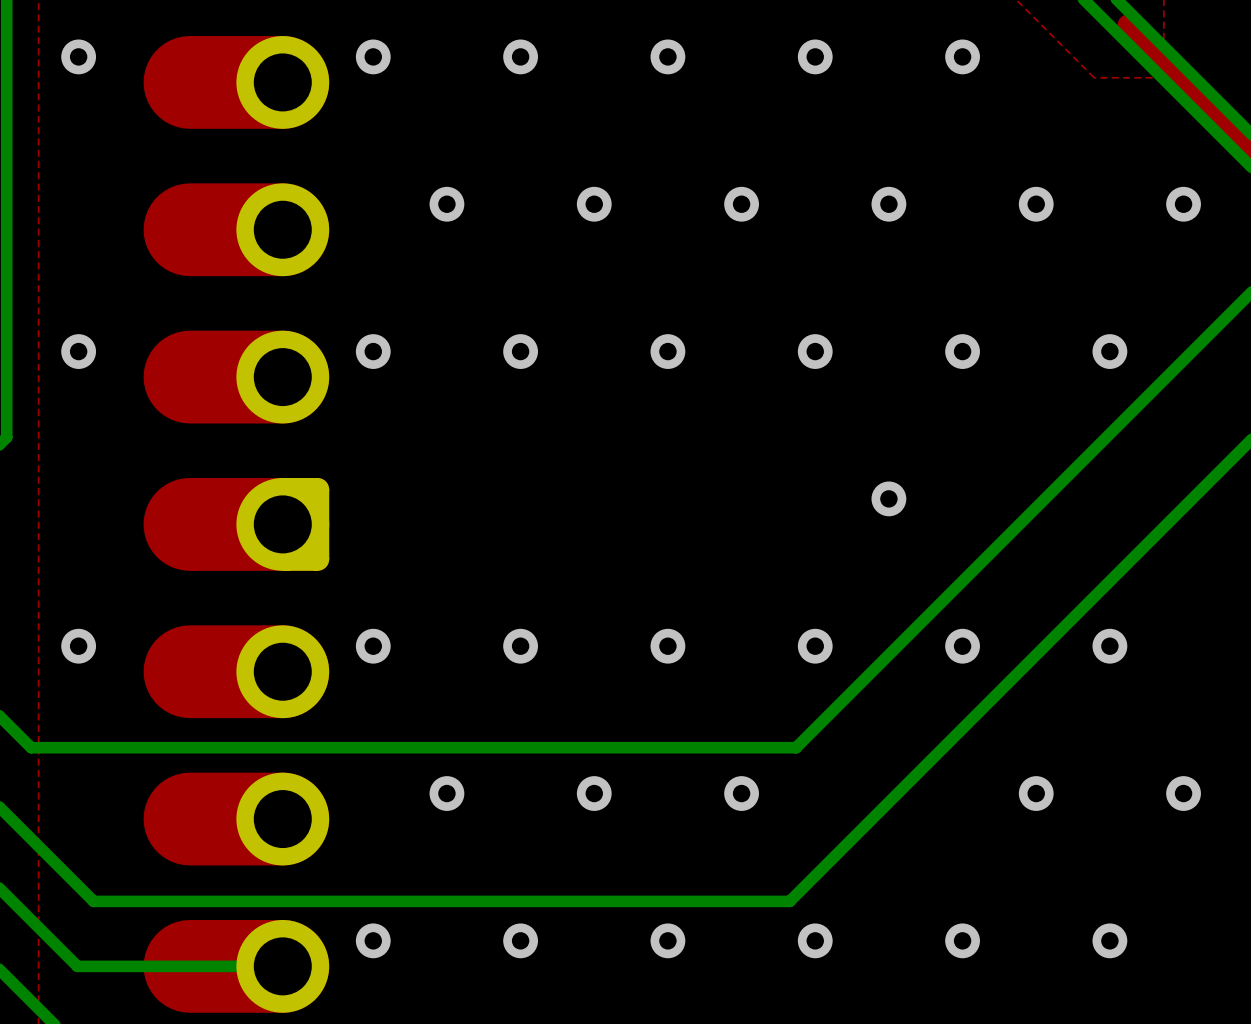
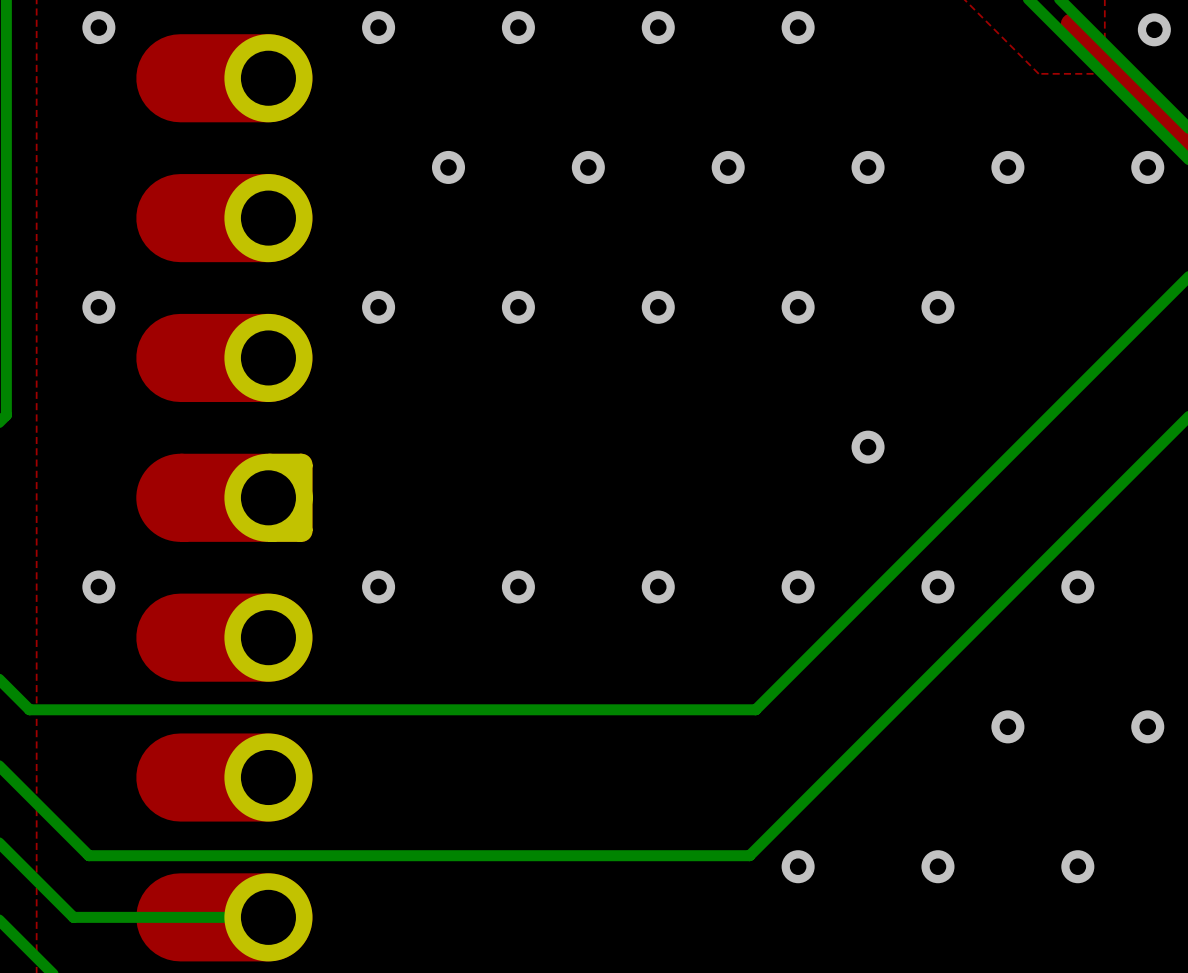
via: none -> (1154, 29)
via position: (78, 56) -> (98, 27)
via position: (373, 56) -> (378, 27)
via position: (520, 56) -> (518, 27)
via position: (667, 56) -> (658, 27)
via position: (815, 56) -> (798, 27)
via: (962, 56) -> none
via position: (446, 204) -> (448, 167)
via position: (594, 204) -> (588, 167)
via position: (741, 204) -> (728, 167)
via position: (888, 204) -> (868, 167)
via position: (1036, 204) -> (1007, 167)
via position: (1183, 204) -> (1147, 167)
via position: (78, 351) -> (98, 307)
via position: (373, 351) -> (378, 307)
via position: (520, 351) -> (518, 307)
via position: (667, 351) -> (658, 307)
via position: (815, 351) -> (798, 307)
via position: (962, 351) -> (937, 307)
via: (1109, 351) -> none
via position: (888, 498) -> (868, 447)
via position: (78, 646) -> (98, 587)
via position: (373, 646) -> (378, 587)
via position: (520, 646) -> (518, 587)
via position: (667, 646) -> (658, 587)
via position: (815, 646) -> (798, 587)
via position: (962, 646) -> (937, 587)
via position: (1109, 646) -> (1077, 587)
via: (446, 793) -> none
via: (594, 793) -> none
via: (741, 793) -> none
via position: (1036, 793) -> (1007, 726)
via position: (1183, 793) -> (1147, 726)
via: (373, 940) -> none
via: (520, 940) -> none
via: (667, 940) -> none
via position: (815, 940) -> (798, 866)
via position: (962, 940) -> (937, 866)
via position: (1109, 940) -> (1077, 866)

